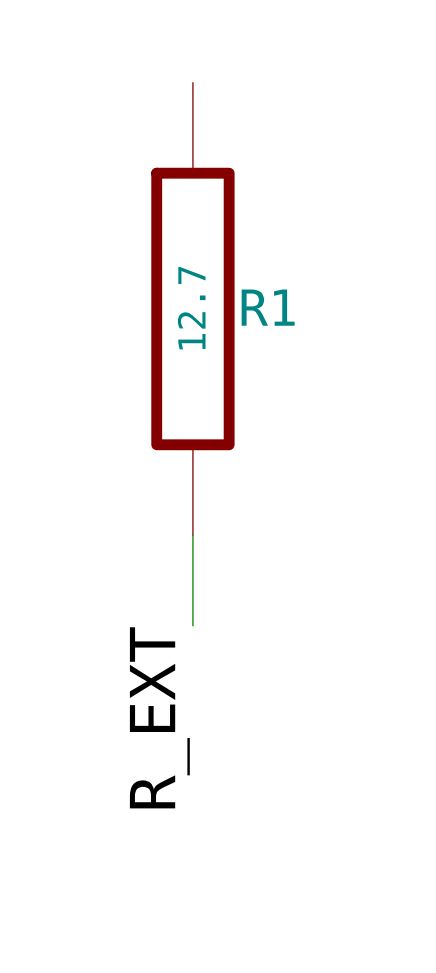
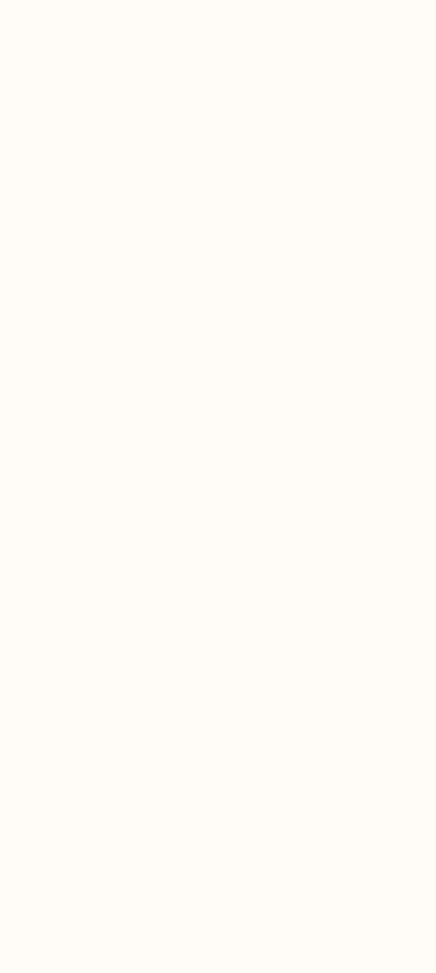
R1: 12.7 (192, 308) -> none
wire: (192, 535) (192, 625) -> none
label: R_EXT (159, 717) -> none

